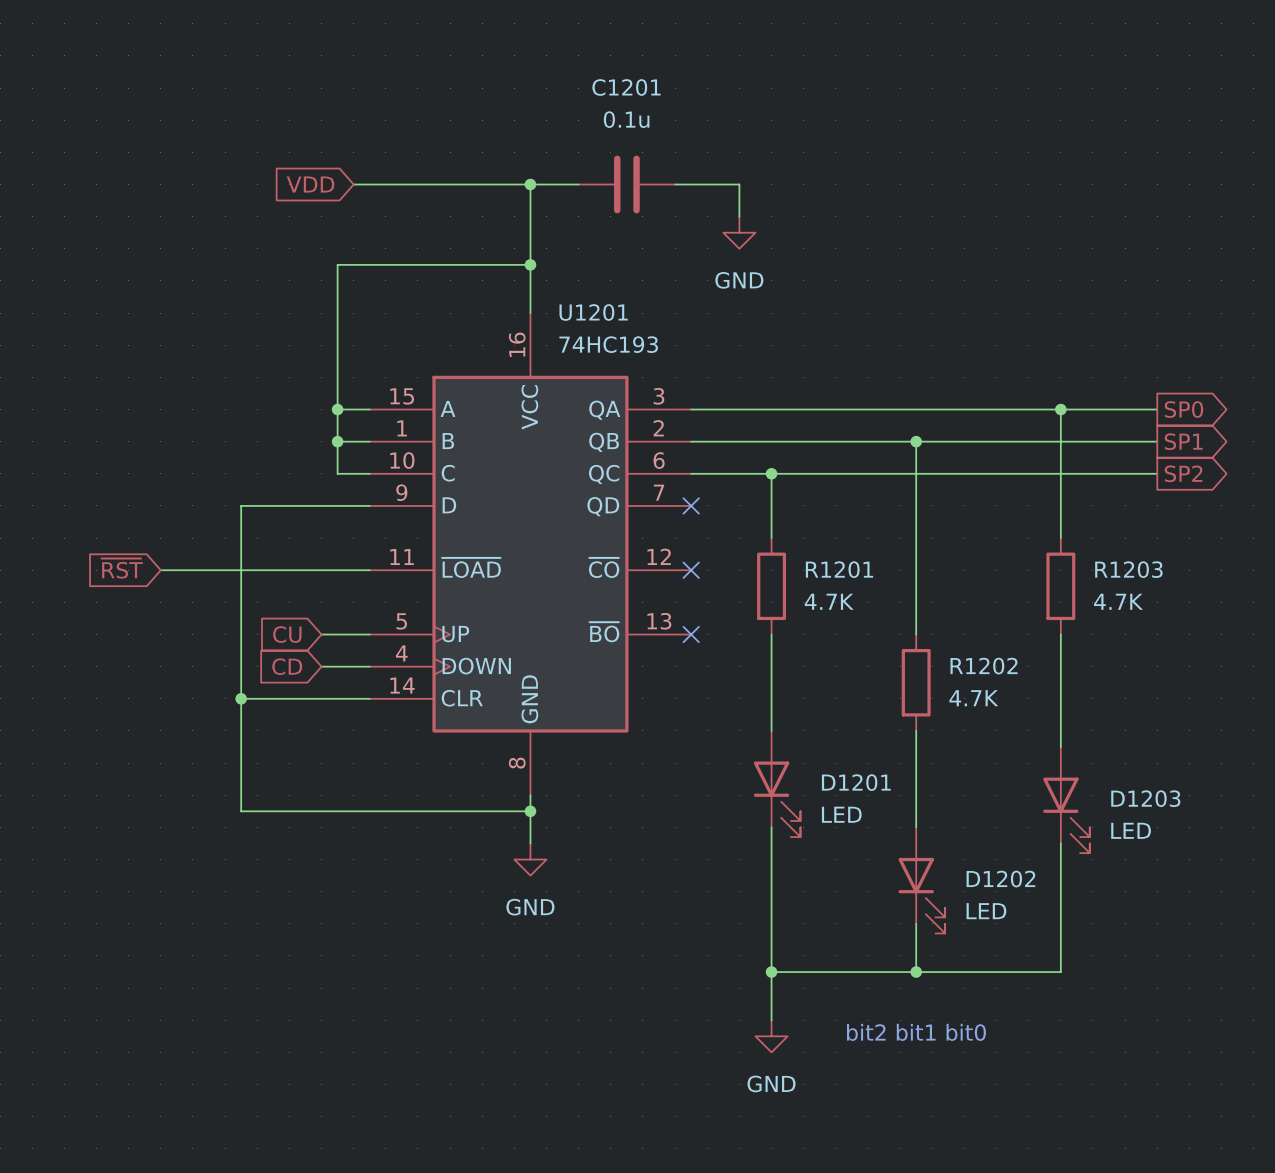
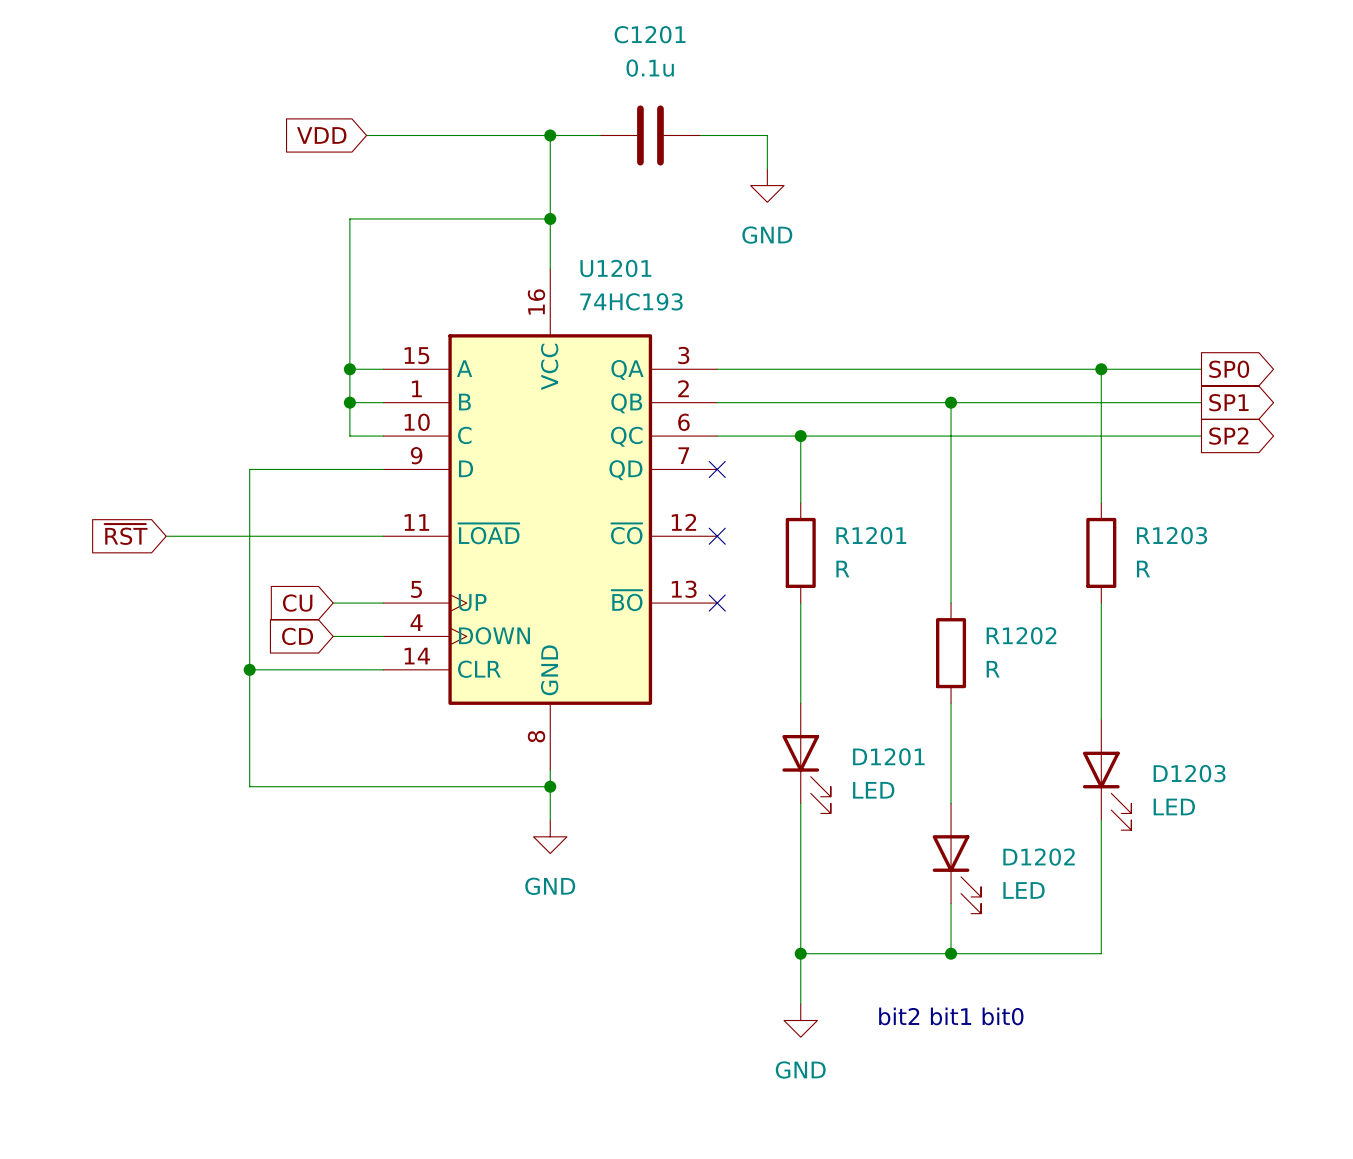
R1201 value: 4.7K (829, 601) -> R (842, 569)
R1203 value: 4.7K (1118, 601) -> R (1143, 569)
R1202 value: 4.7K (973, 698) -> R (993, 669)

